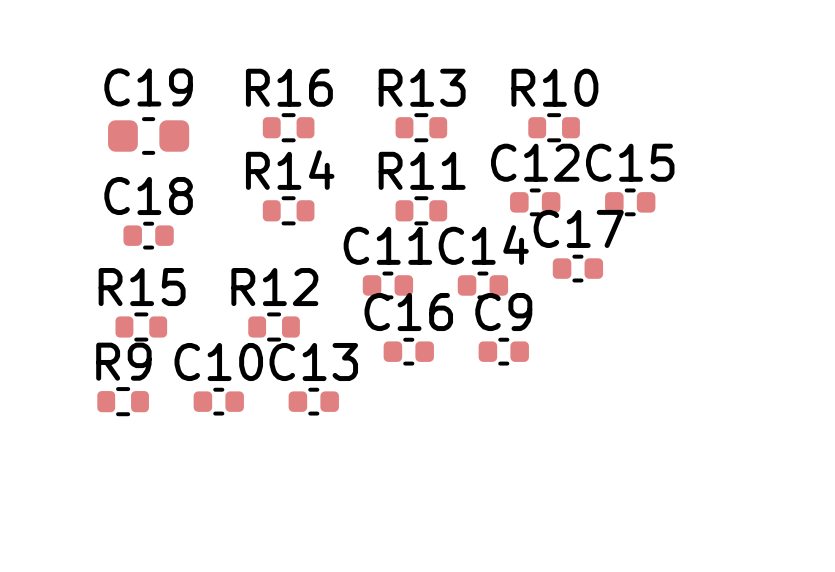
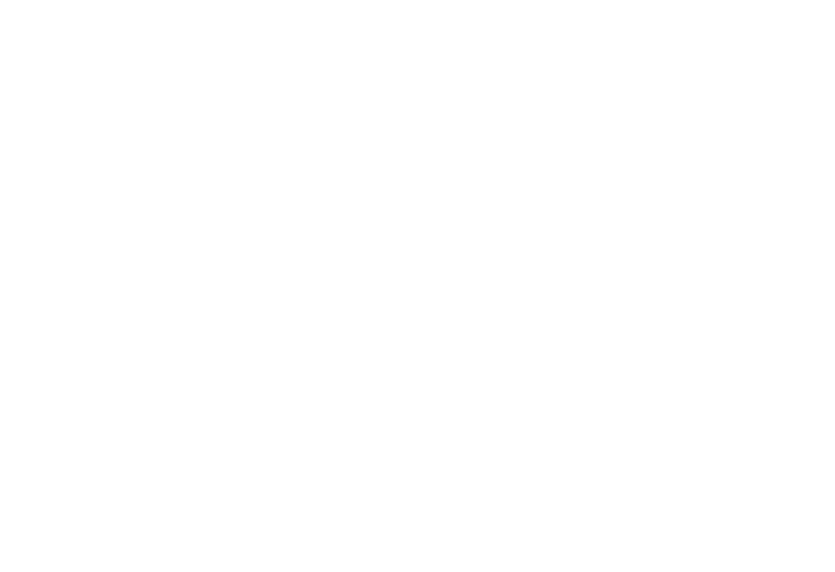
R16: (288, 127) -> none
R13: (421, 127) -> none
R10: (554, 127) -> none
C19: (148, 136) -> none
C12: (535, 202) -> none
C15: (630, 202) -> none
R14: (288, 210) -> none
R11: (421, 210) -> none
C18: (148, 235) -> none
C17: (577, 268) -> none
C11: (387, 285) -> none
C14: (482, 285) -> none
R15: (141, 326) -> none
R12: (274, 326) -> none
C16: (408, 351) -> none
C9: (503, 351) -> none
R9: (123, 401) -> none
C10: (218, 401) -> none
C13: (313, 401) -> none

